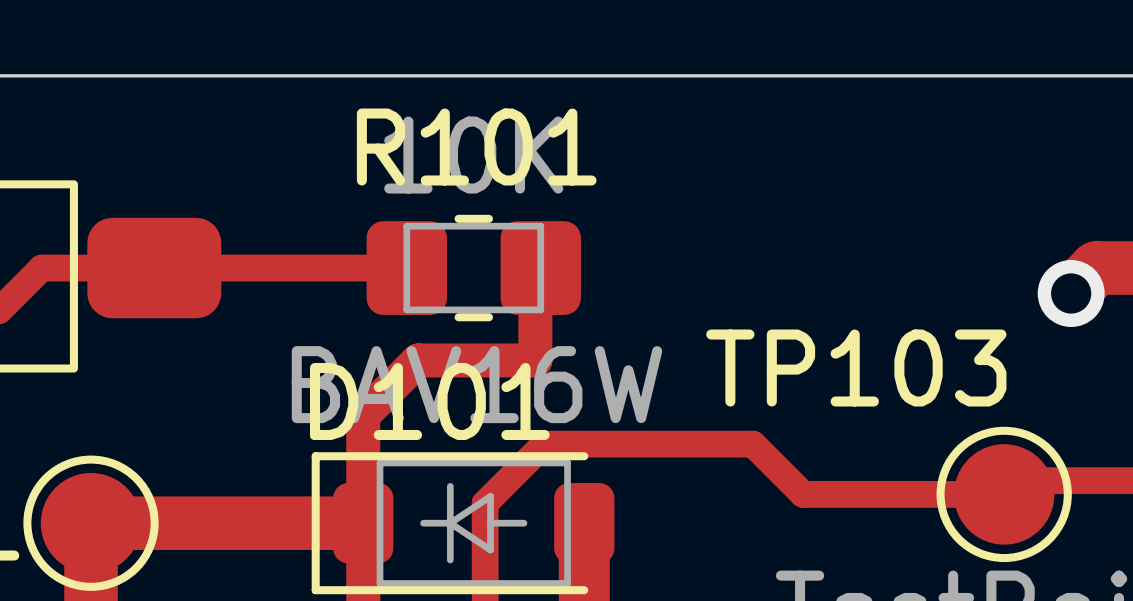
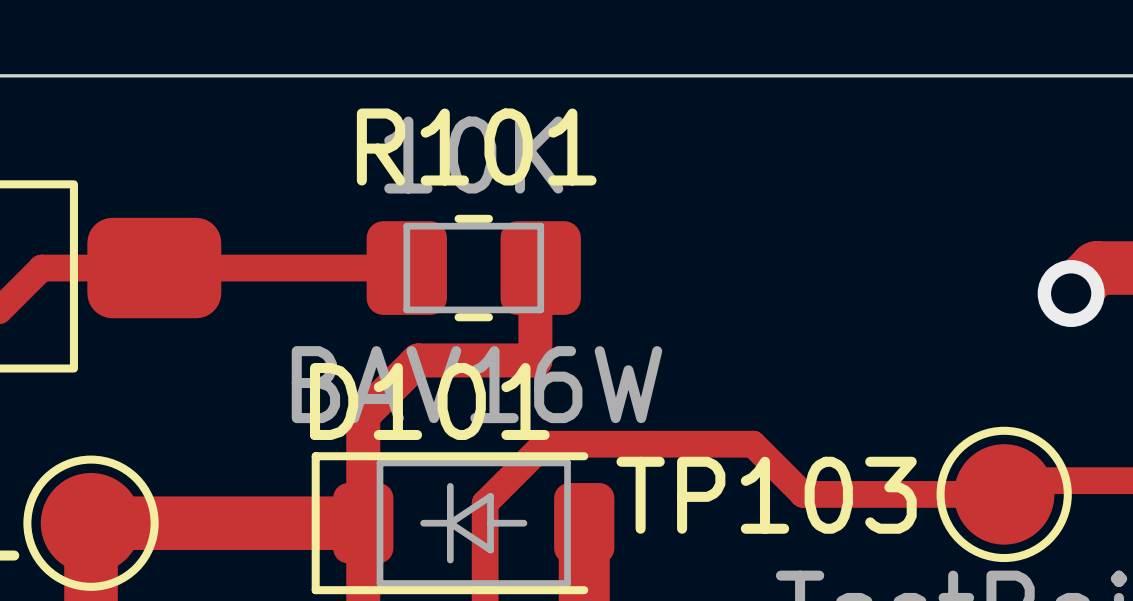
TP103 name position: TP103 (856, 368) -> TP103 (766, 495)

